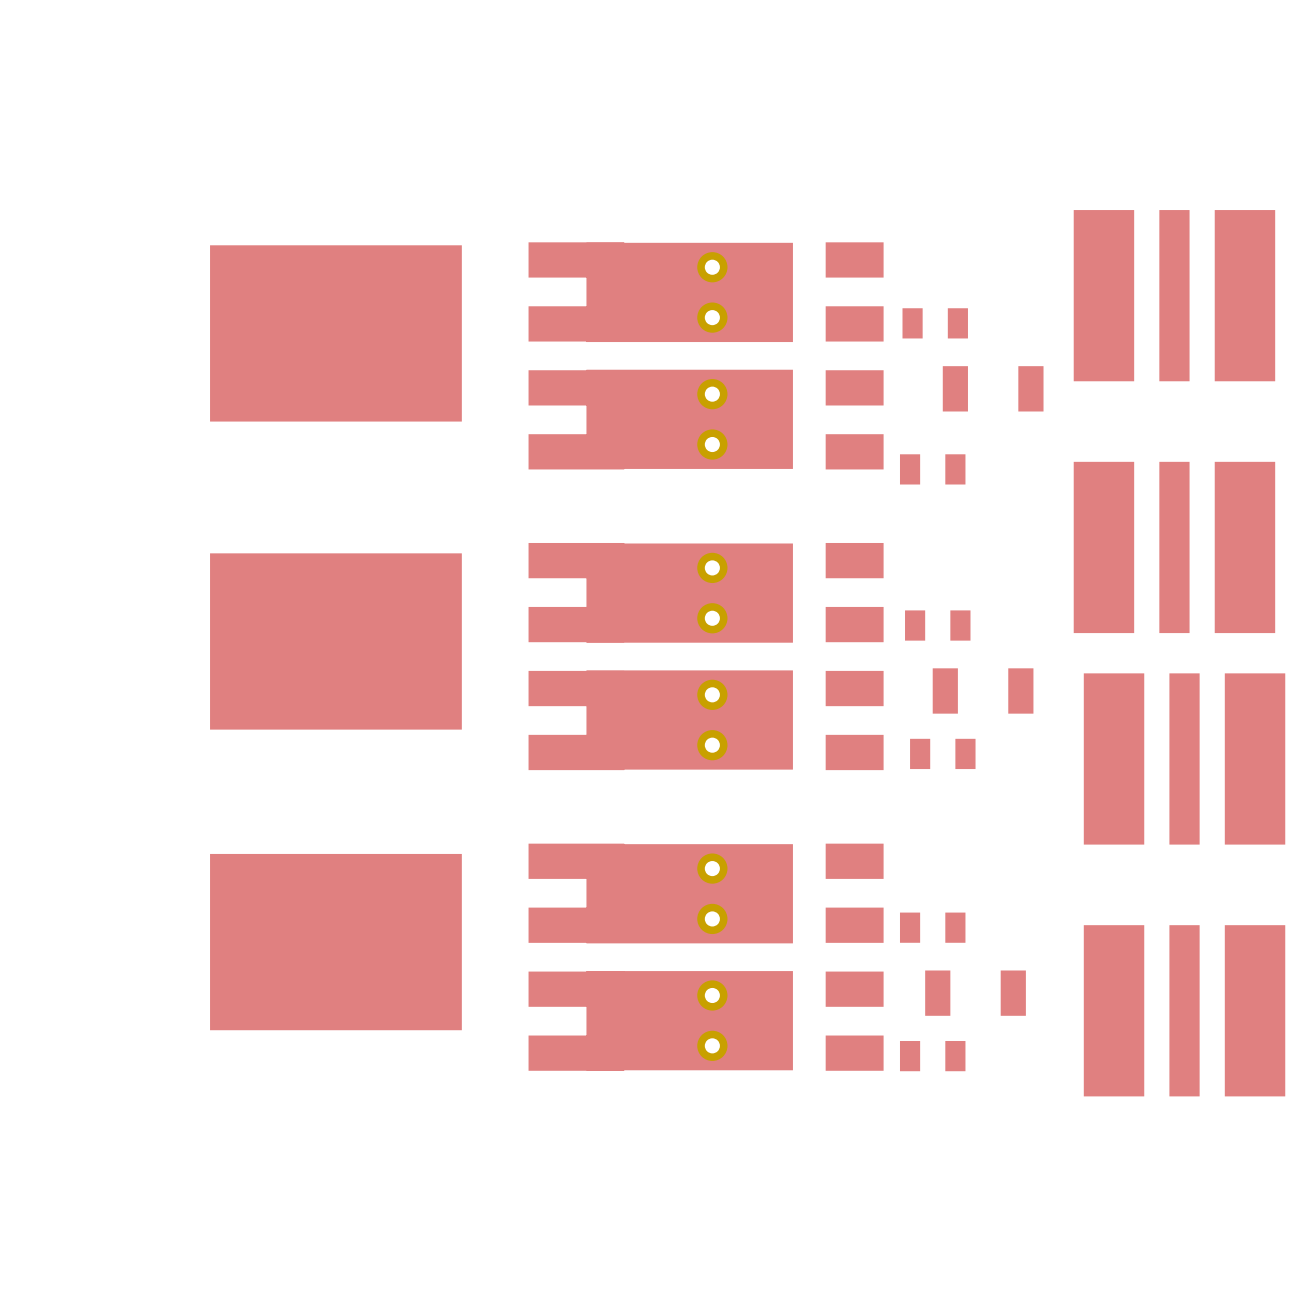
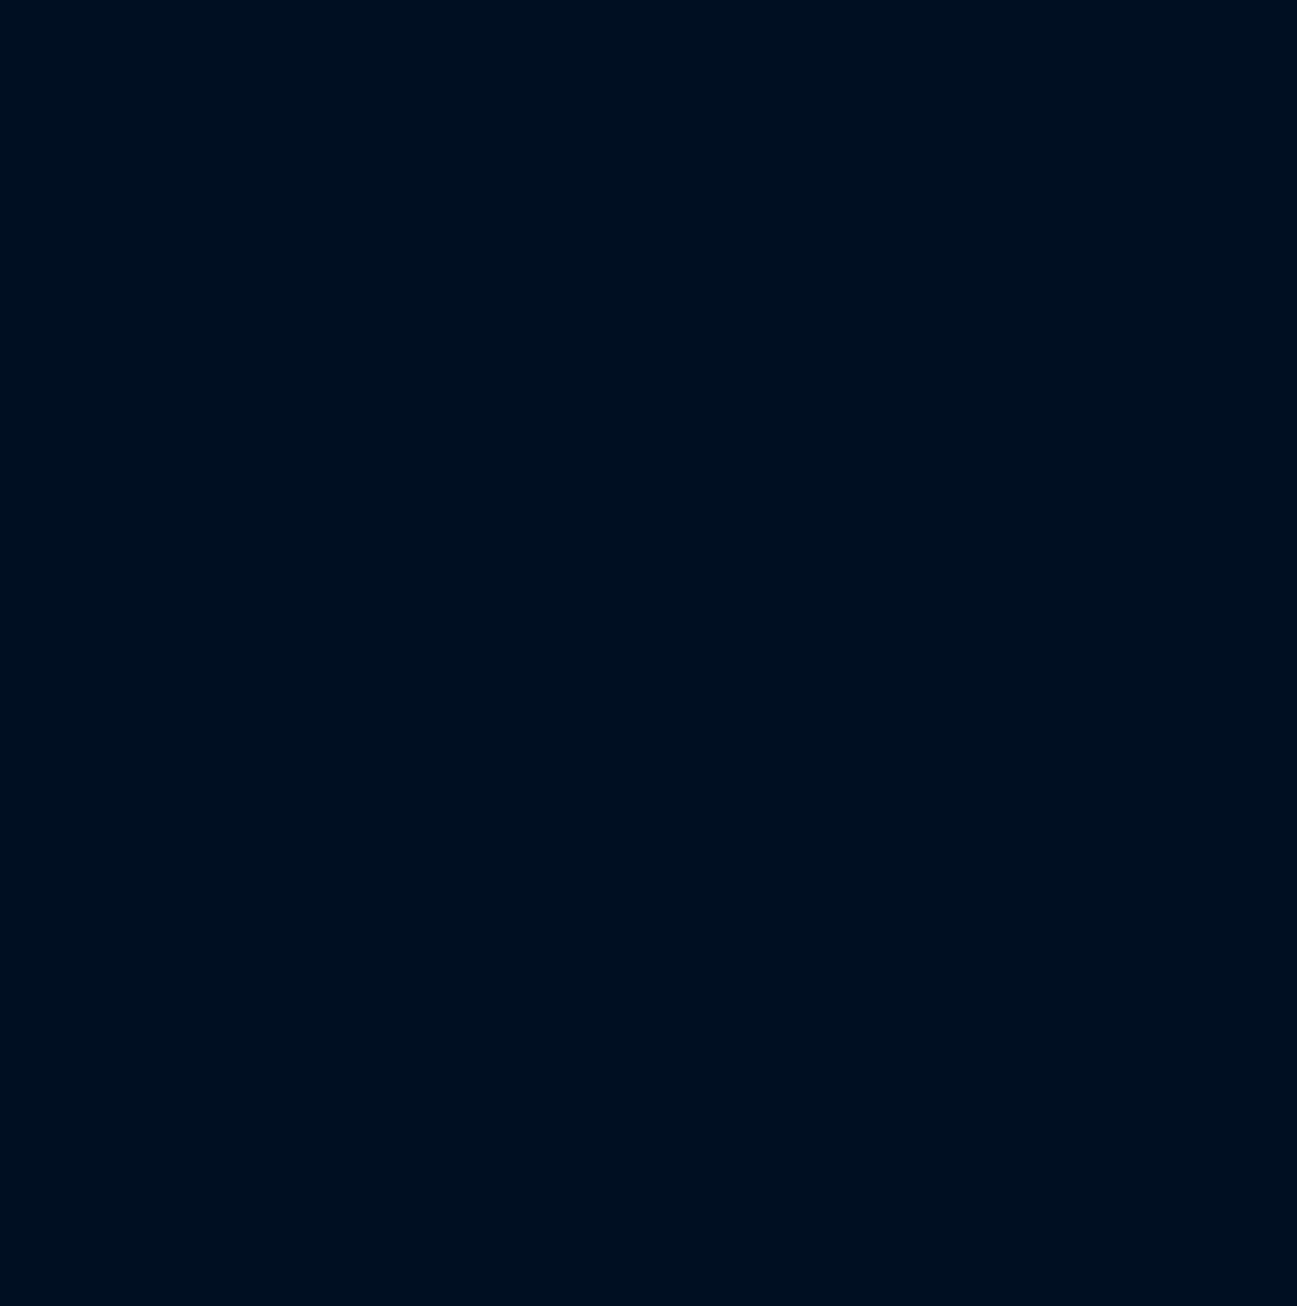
part: (935, 323) -> none
part: (335, 333) -> none
part: (706, 355) -> none
part: (993, 388) -> none
part: (1174, 421) -> none
part: (932, 469) -> none
part: (937, 625) -> none
part: (335, 641) -> none
part: (706, 656) -> none
part: (983, 690) -> none
part: (942, 753) -> none
part: (1184, 884) -> none
part: (932, 927) -> none
part: (335, 942) -> none
part: (706, 957) -> none
part: (975, 993) -> none
part: (932, 1056) -> none

